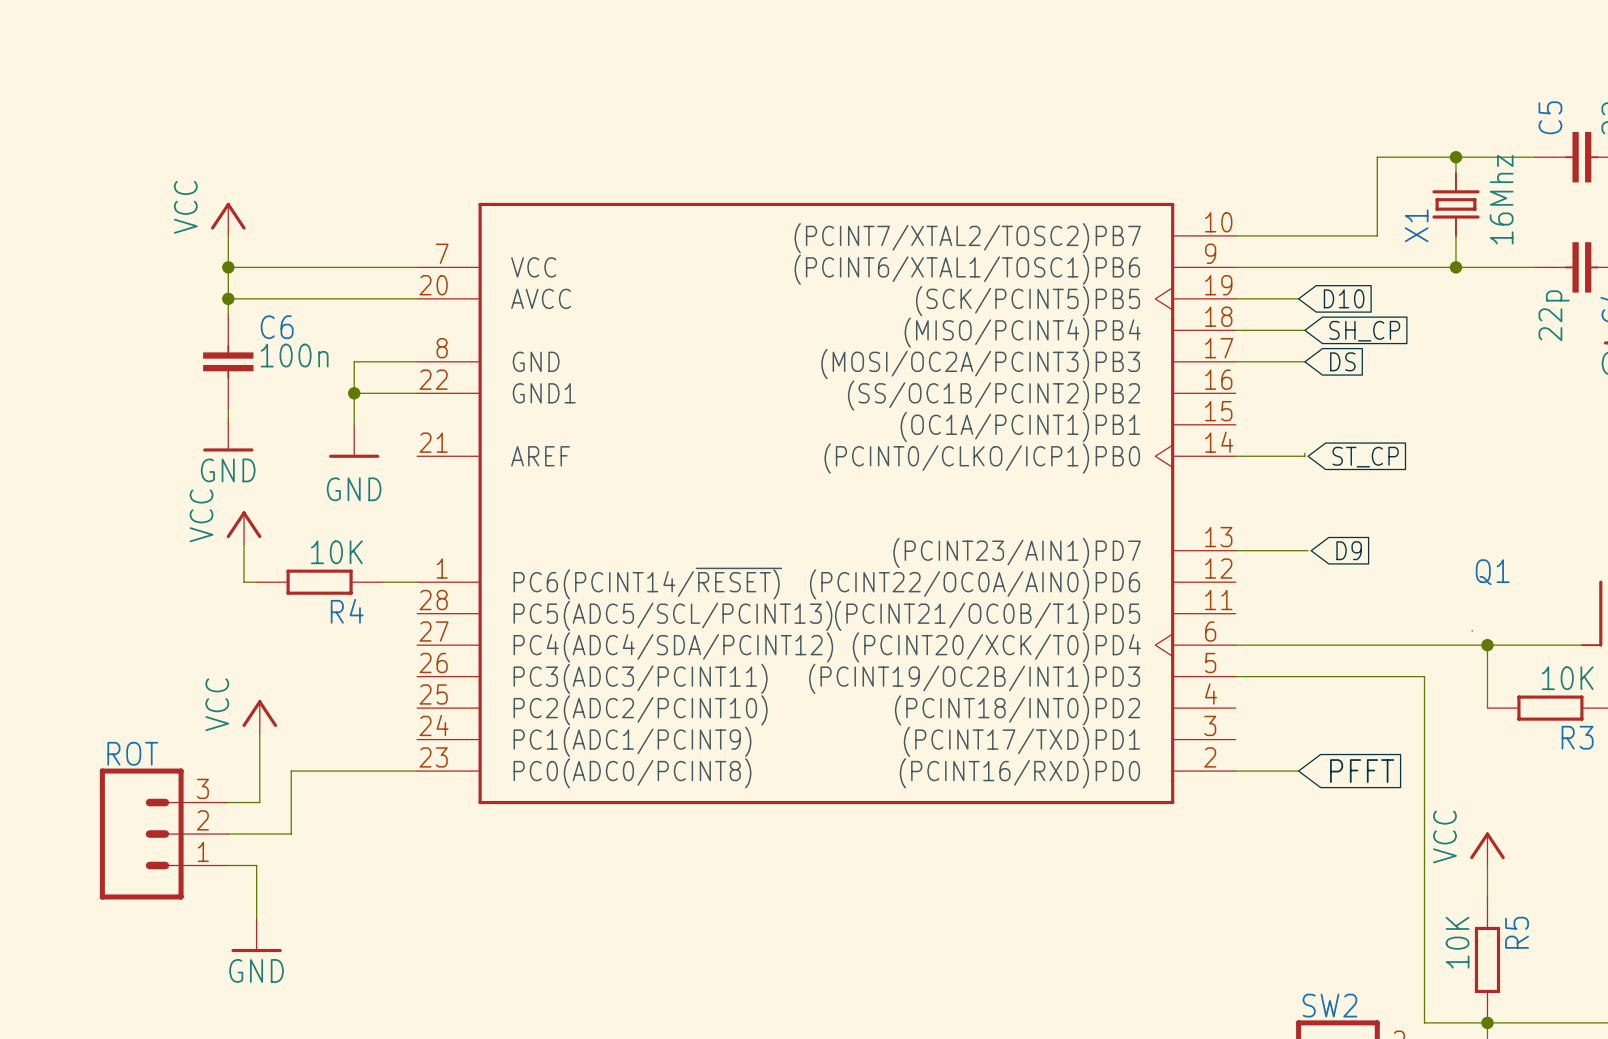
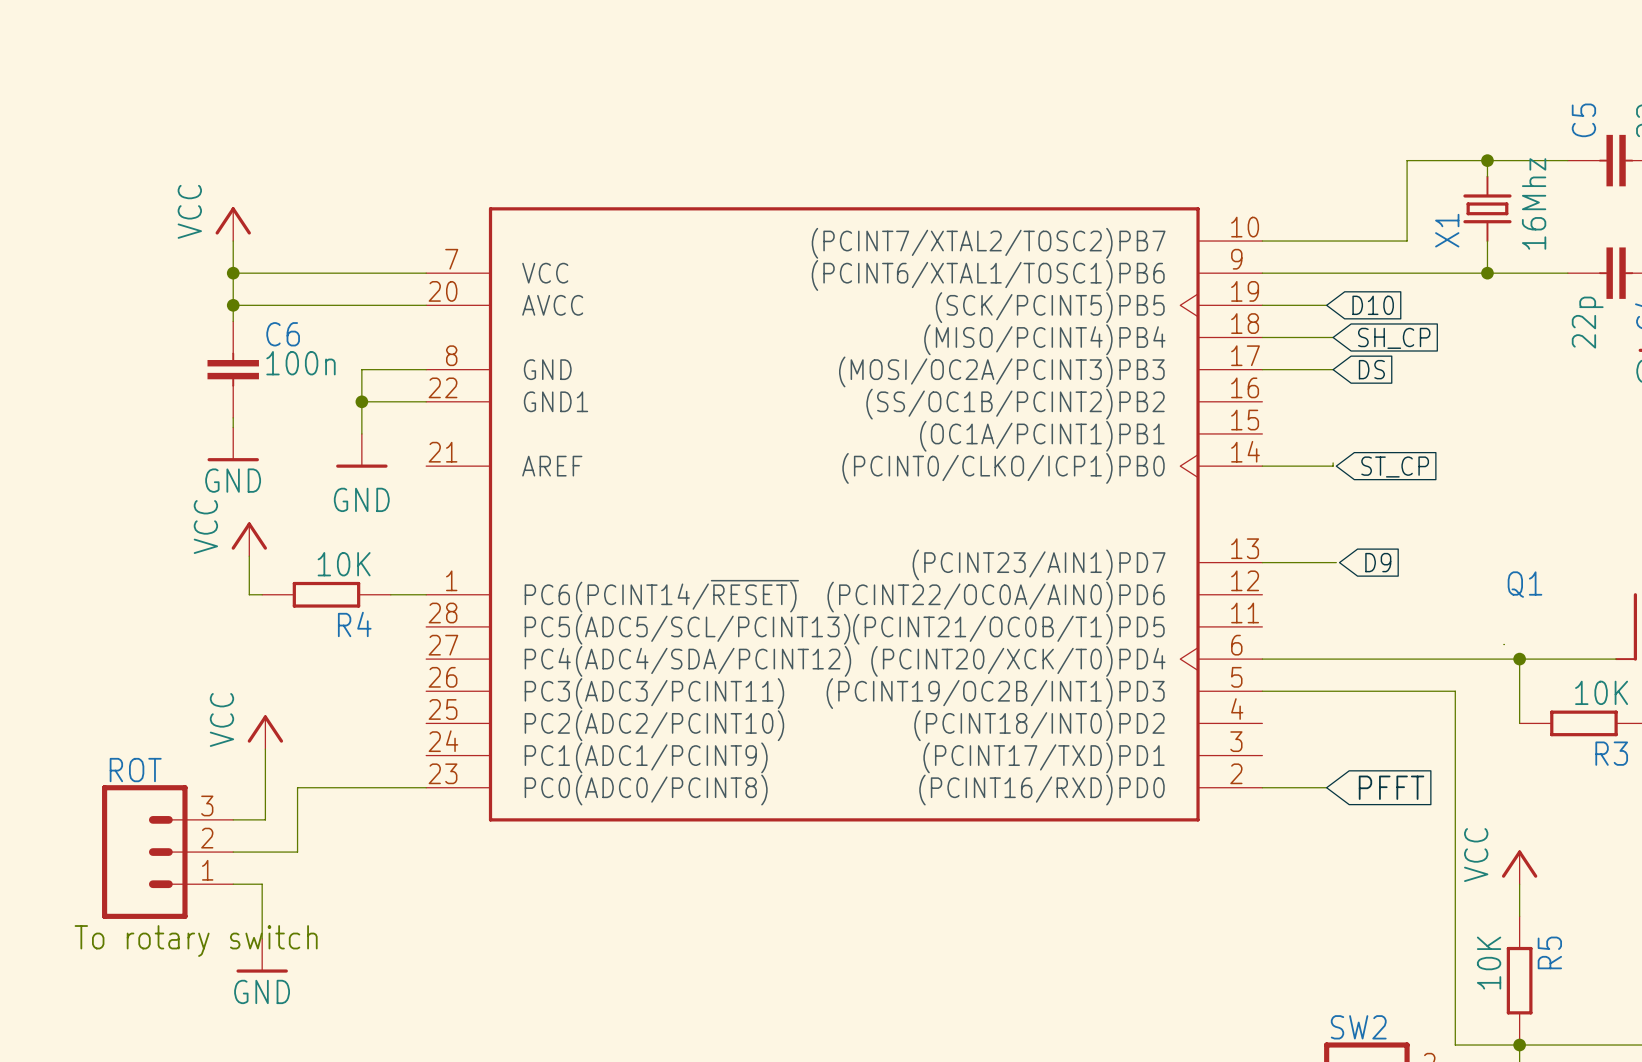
text: none -> To rotary switch (196, 941)

